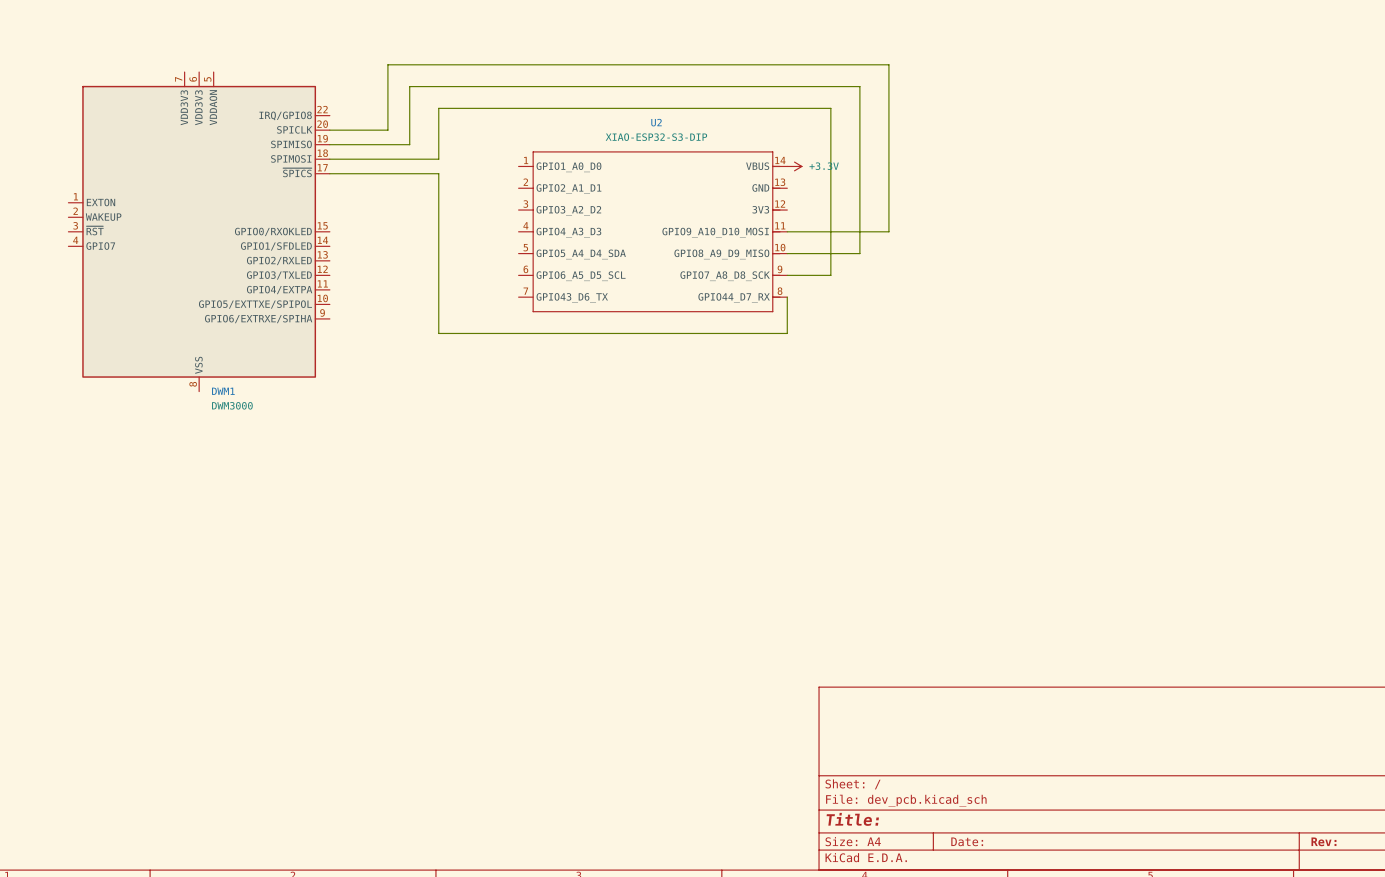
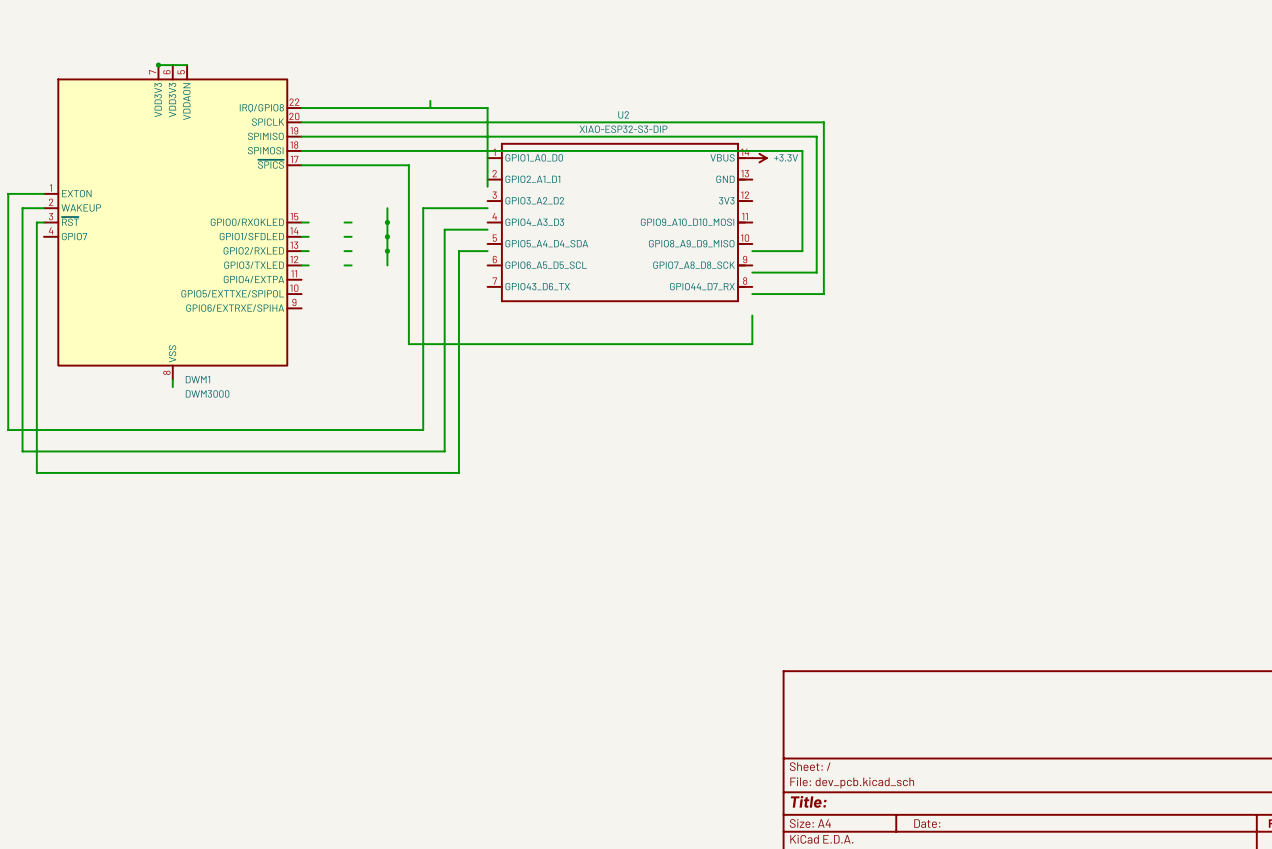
wire: none -> (158, 65) (187, 65)
junction: none -> (158, 65)
wire: none -> (430, 100) (430, 108)
wire: none -> (301, 108) (487, 108) (487, 186)
wire: (387, 130) (387, 64) (888, 64) (888, 231) (787, 231) -> none
wire: (859, 130) (859, 86) (409, 86) (409, 144) -> (823, 122) (358, 122)
wire: none -> (380, 136) (816, 136) (816, 272) (752, 272)
wire: (438, 159) (438, 108) (830, 108) (830, 275) (787, 275) -> (408, 150) (802, 150) (802, 251) (752, 251)
wire: none -> (44, 193) (8, 193) (8, 430) (423, 430) (423, 208) (487, 208)
wire: none -> (44, 208) (22, 208) (22, 451) (444, 451) (444, 229) (487, 229)
wire: none -> (387, 208) (387, 265)
wire: none -> (44, 222) (36, 222) (36, 472) (458, 472) (458, 251) (487, 251)
wire: none -> (301, 222) (308, 222)
wire: none -> (344, 222) (351, 222)
junction: none -> (387, 222)
wire: none -> (301, 236) (308, 236)
wire: none -> (344, 236) (351, 236)
junction: none -> (387, 236)
wire: (787, 253) (859, 253) -> (752, 294) (823, 294) (823, 243)
wire: none -> (301, 251) (308, 251)
wire: none -> (344, 251) (351, 251)
junction: none -> (387, 251)
wire: none -> (301, 265) (308, 265)
wire: none -> (344, 265) (351, 265)
wire: (787, 297) (787, 326) -> none
wire: (438, 333) (787, 333) -> (408, 322) (408, 344) (752, 344) (752, 322)
wire: none -> (172, 379) (172, 387)

